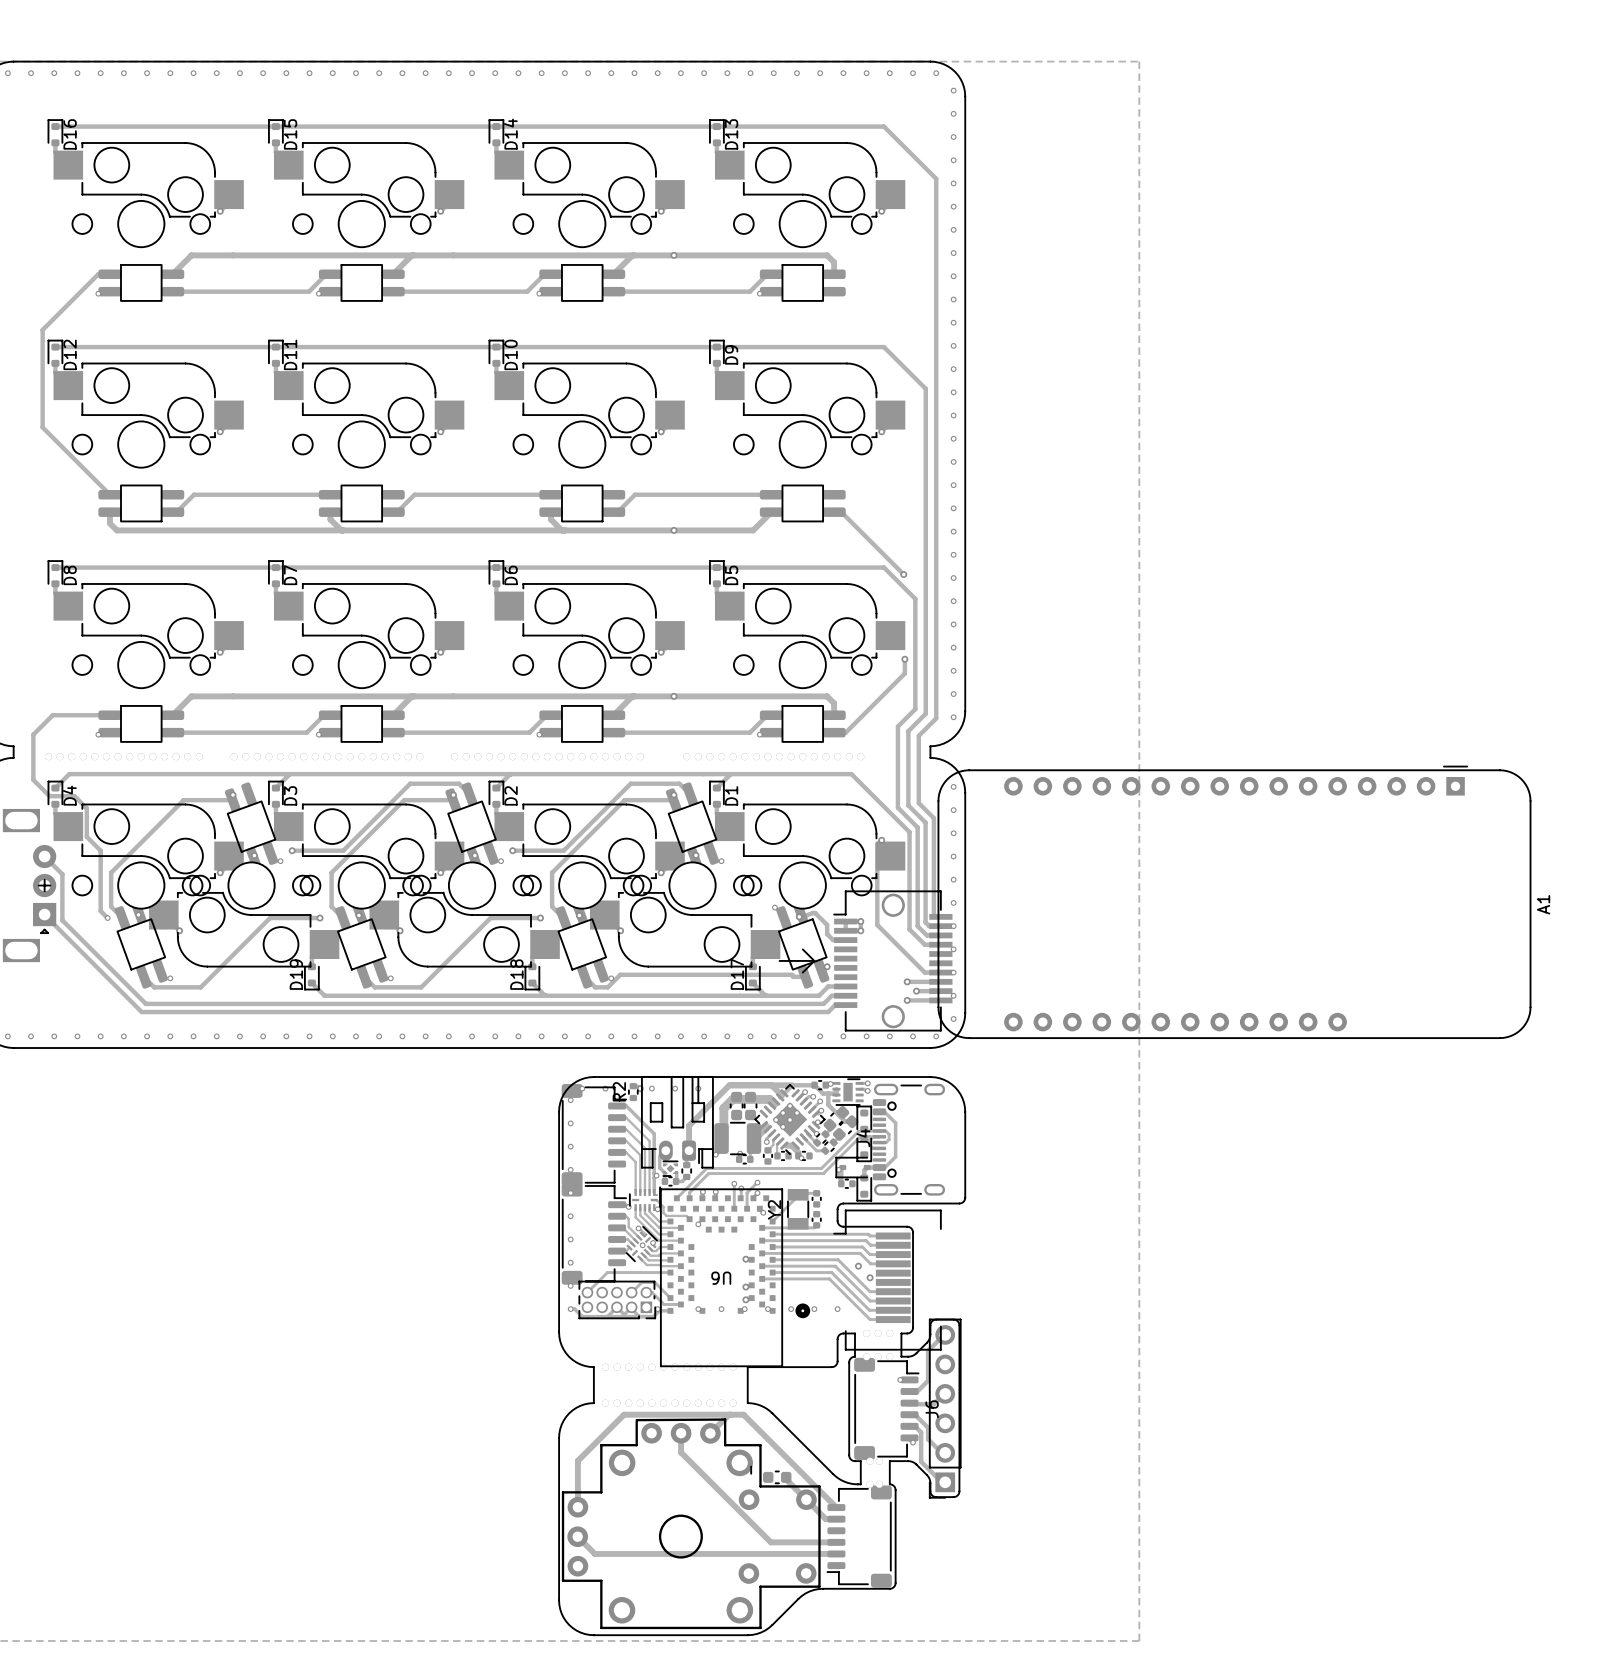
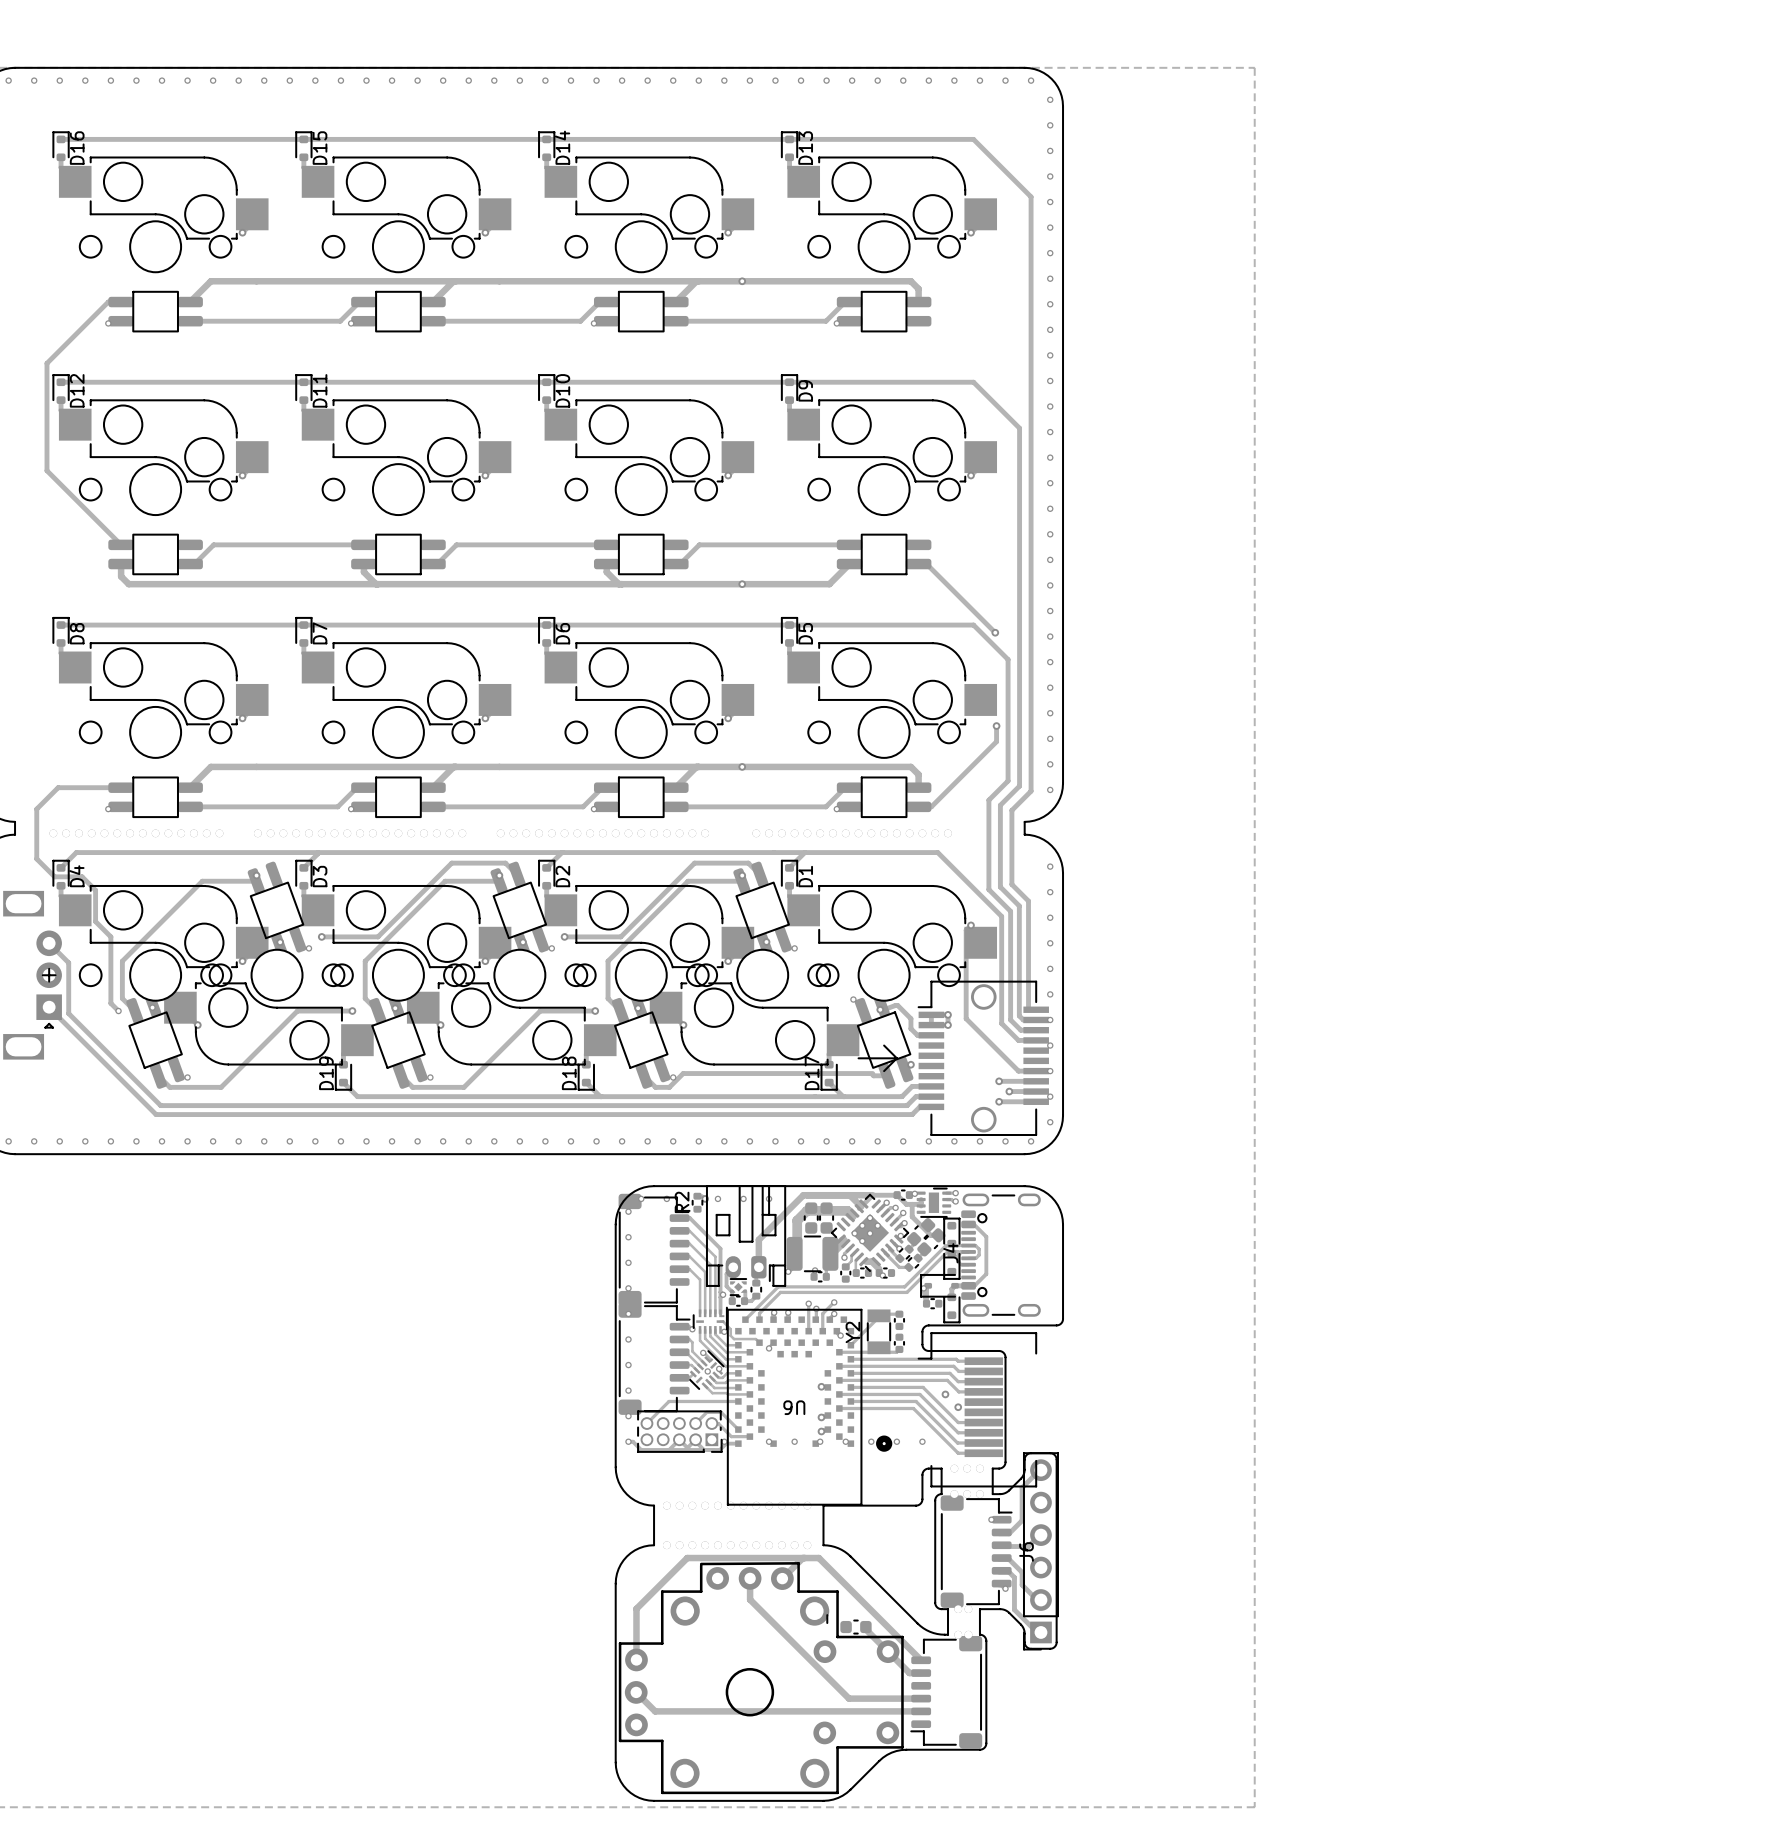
A1: (1234, 902) -> none

